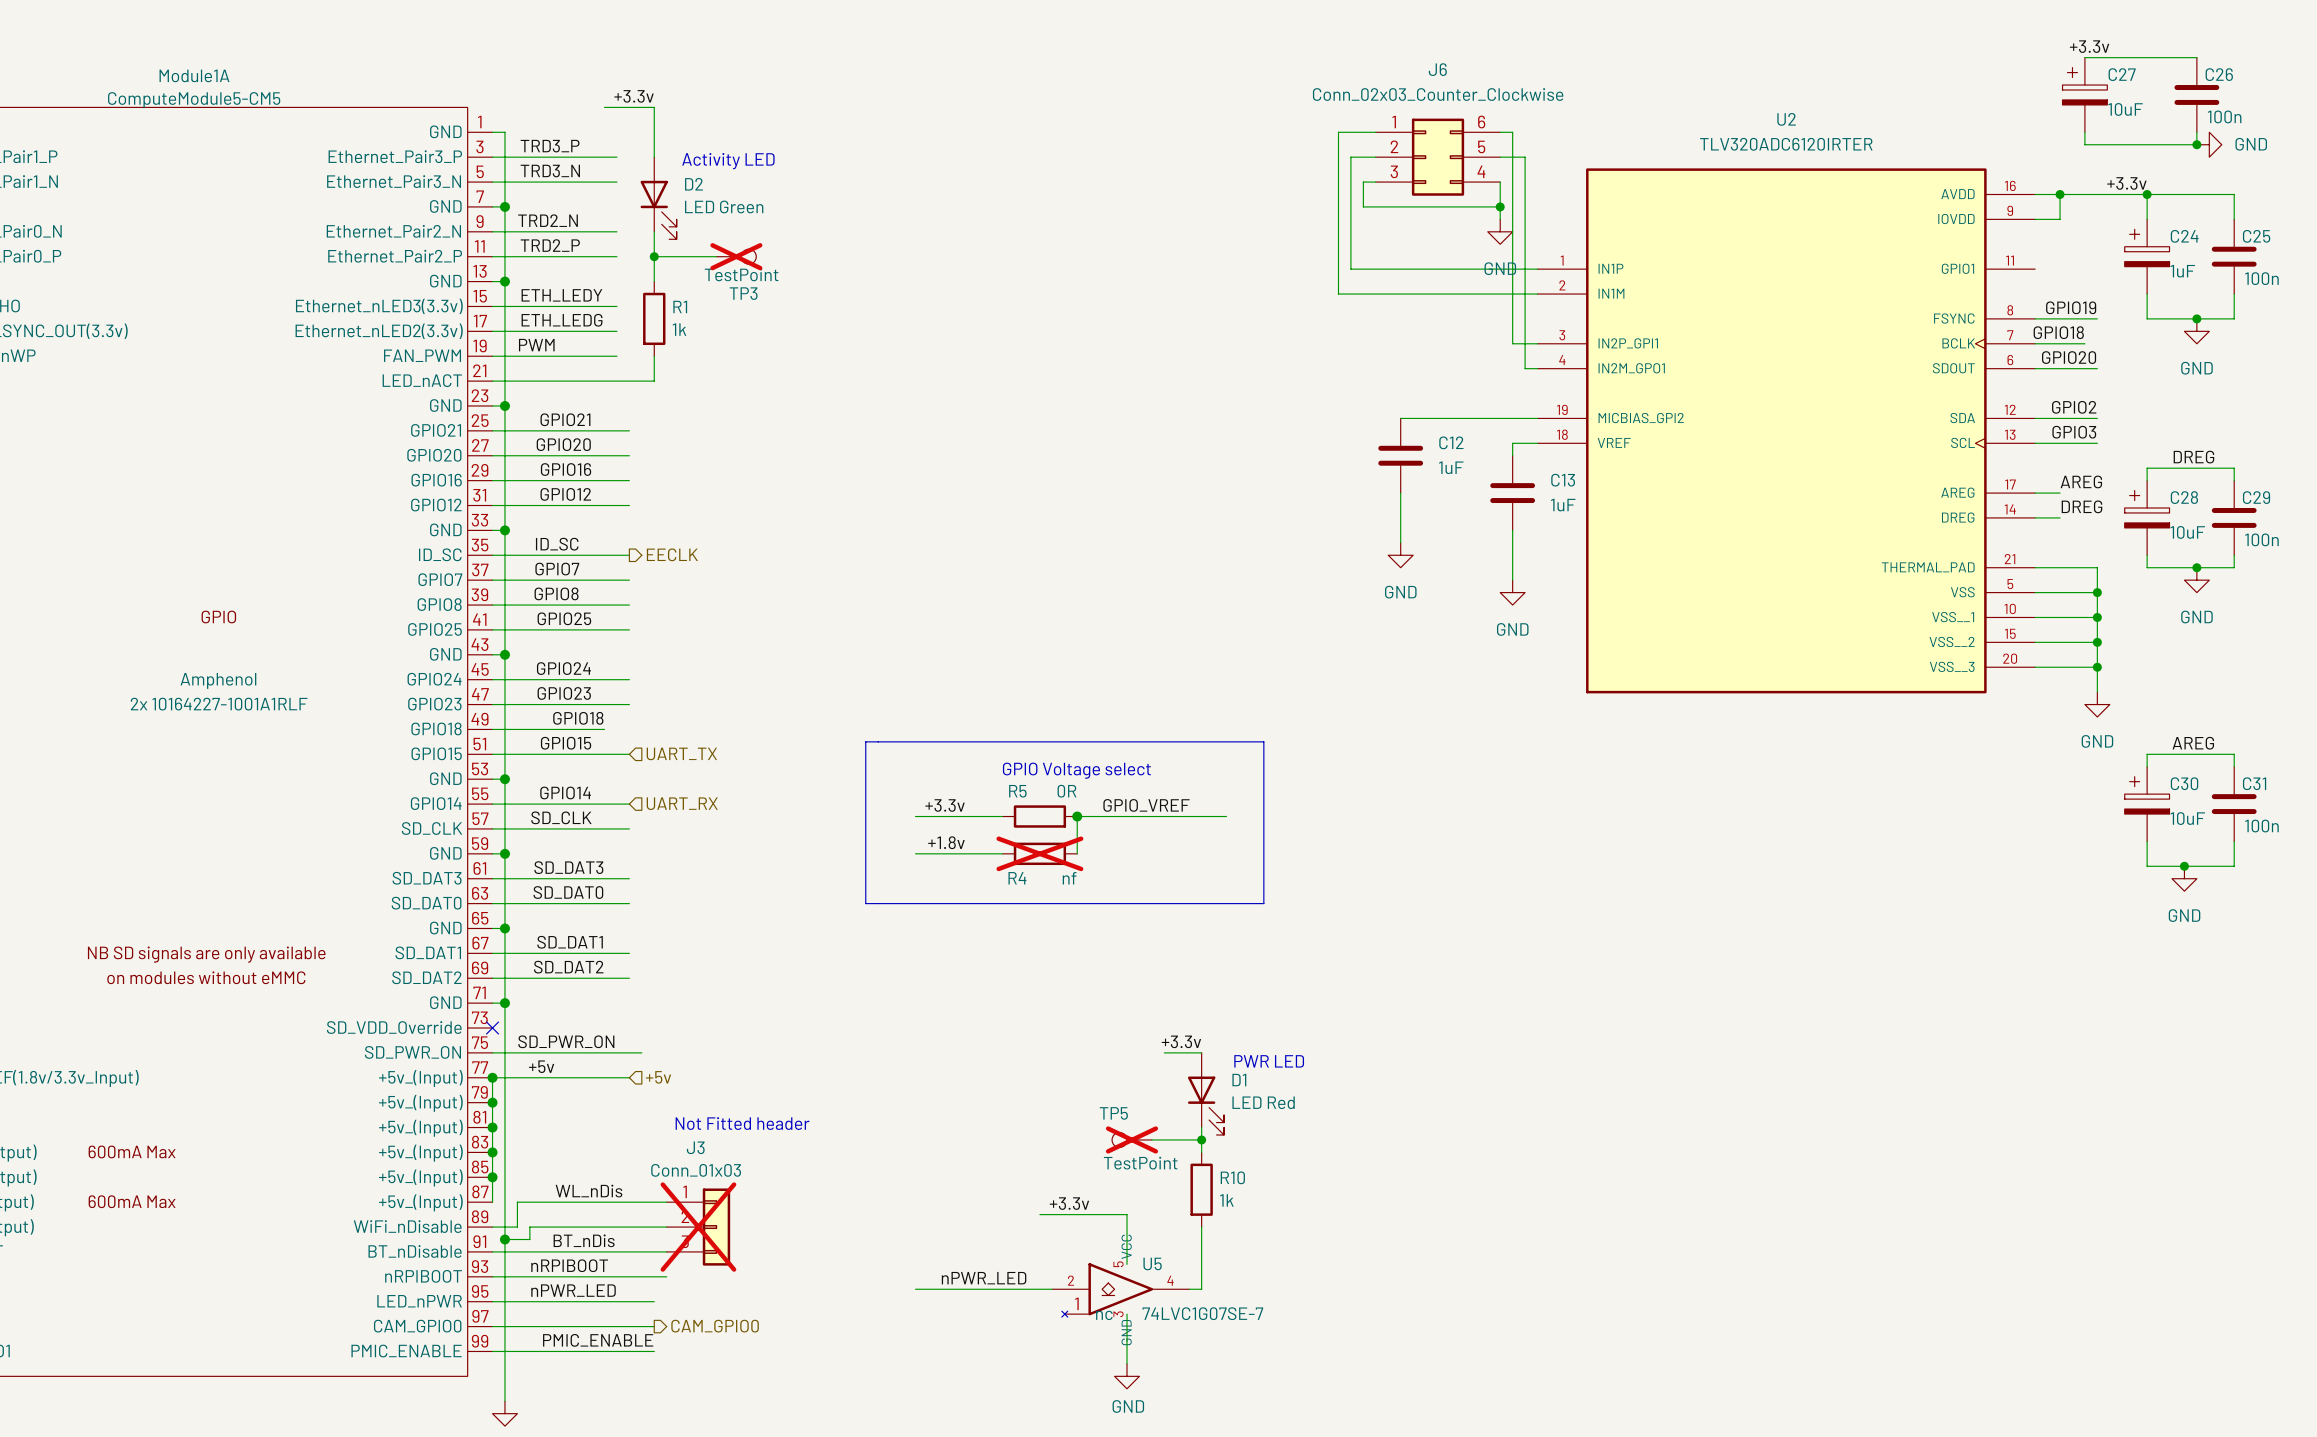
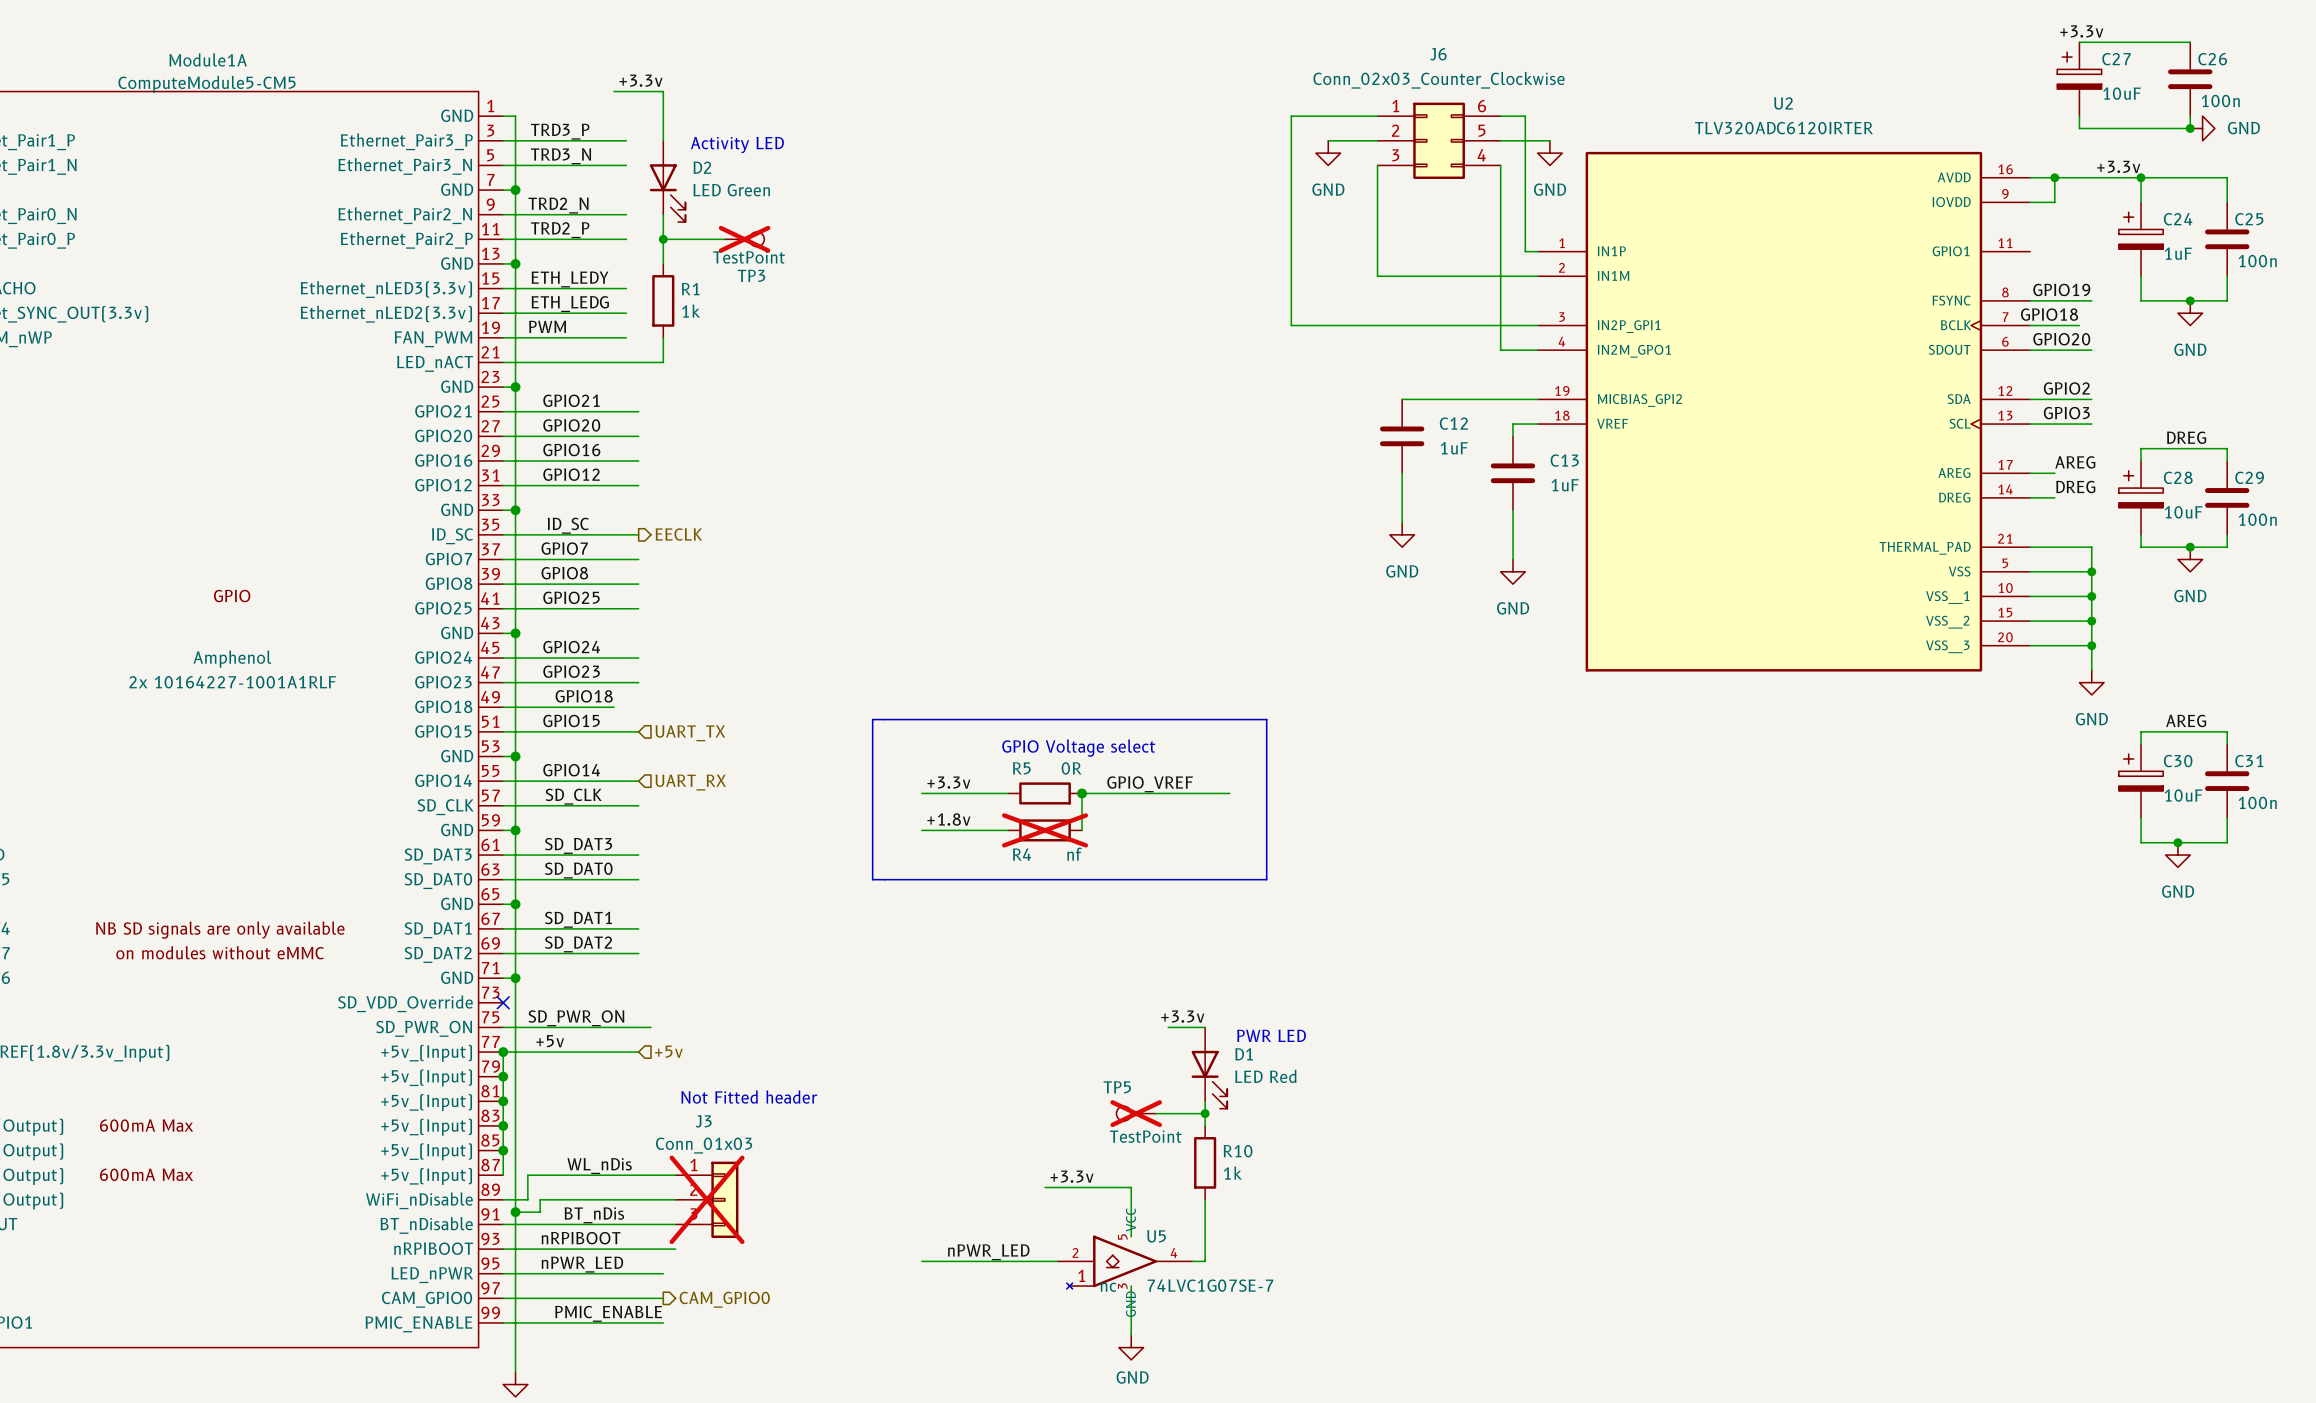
wire: (1338, 132) (1338, 294) (1375, 294) -> (1377, 165) (1377, 276)
wire: (1512, 132) (1512, 343) -> (1340, 116) (1291, 116) (1291, 325) (1512, 325)
wire: none -> (1512, 116) (1525, 116) (1525, 140) (1549, 140)
wire: none -> (1328, 140) (1352, 140)
wire: (1350, 157) (1350, 269) (1525, 269) (1525, 368) -> (1500, 202) (1500, 350) (1525, 350)
power symbol: none -> GND (1328, 153)
wire: (1375, 182) (1363, 182) (1363, 206) (1500, 206) -> none
junction: (1500, 206) -> none
power symbol position: GND (1500, 231) -> GND (1549, 153)

